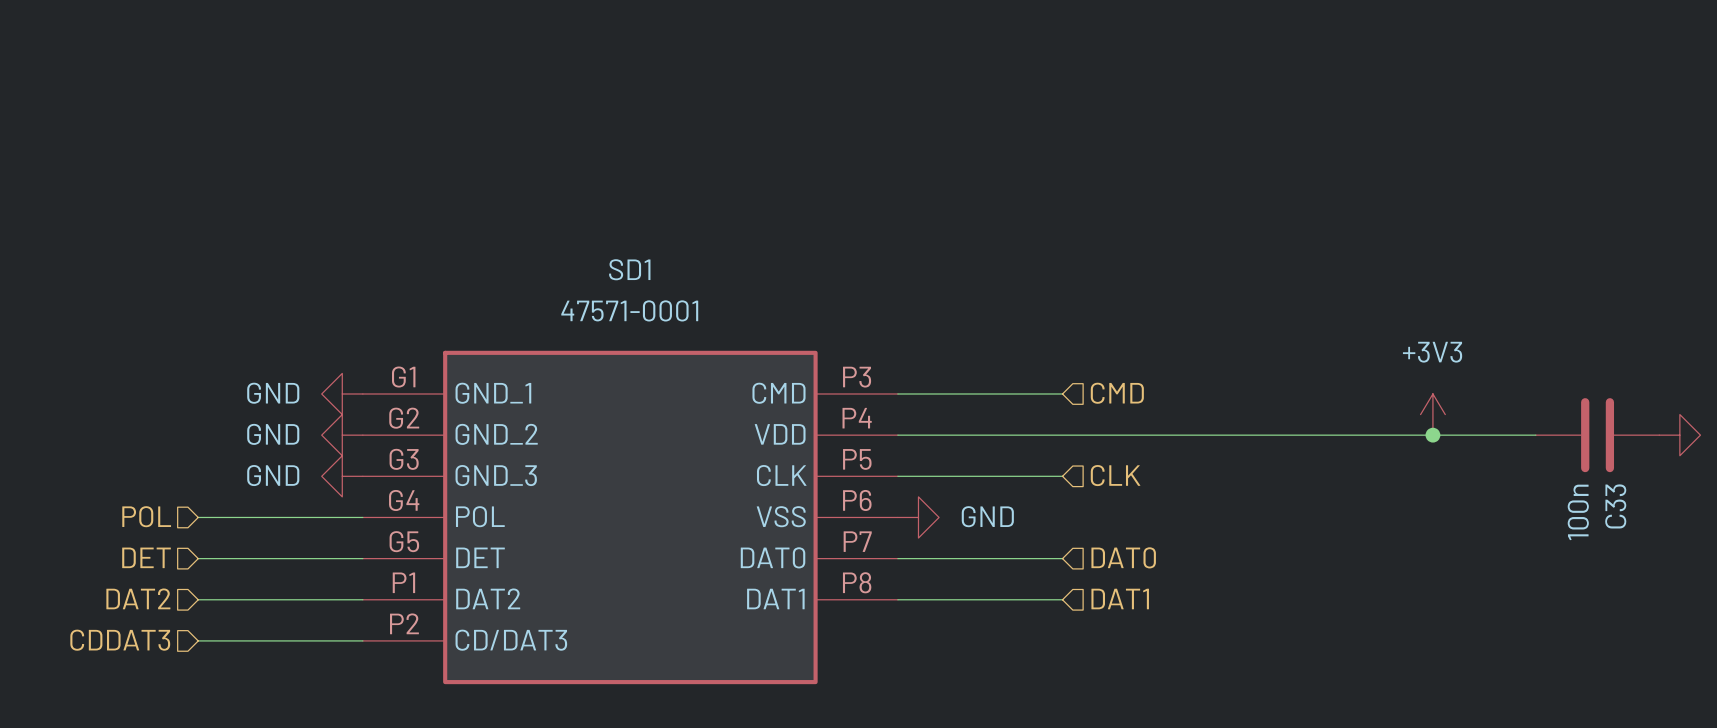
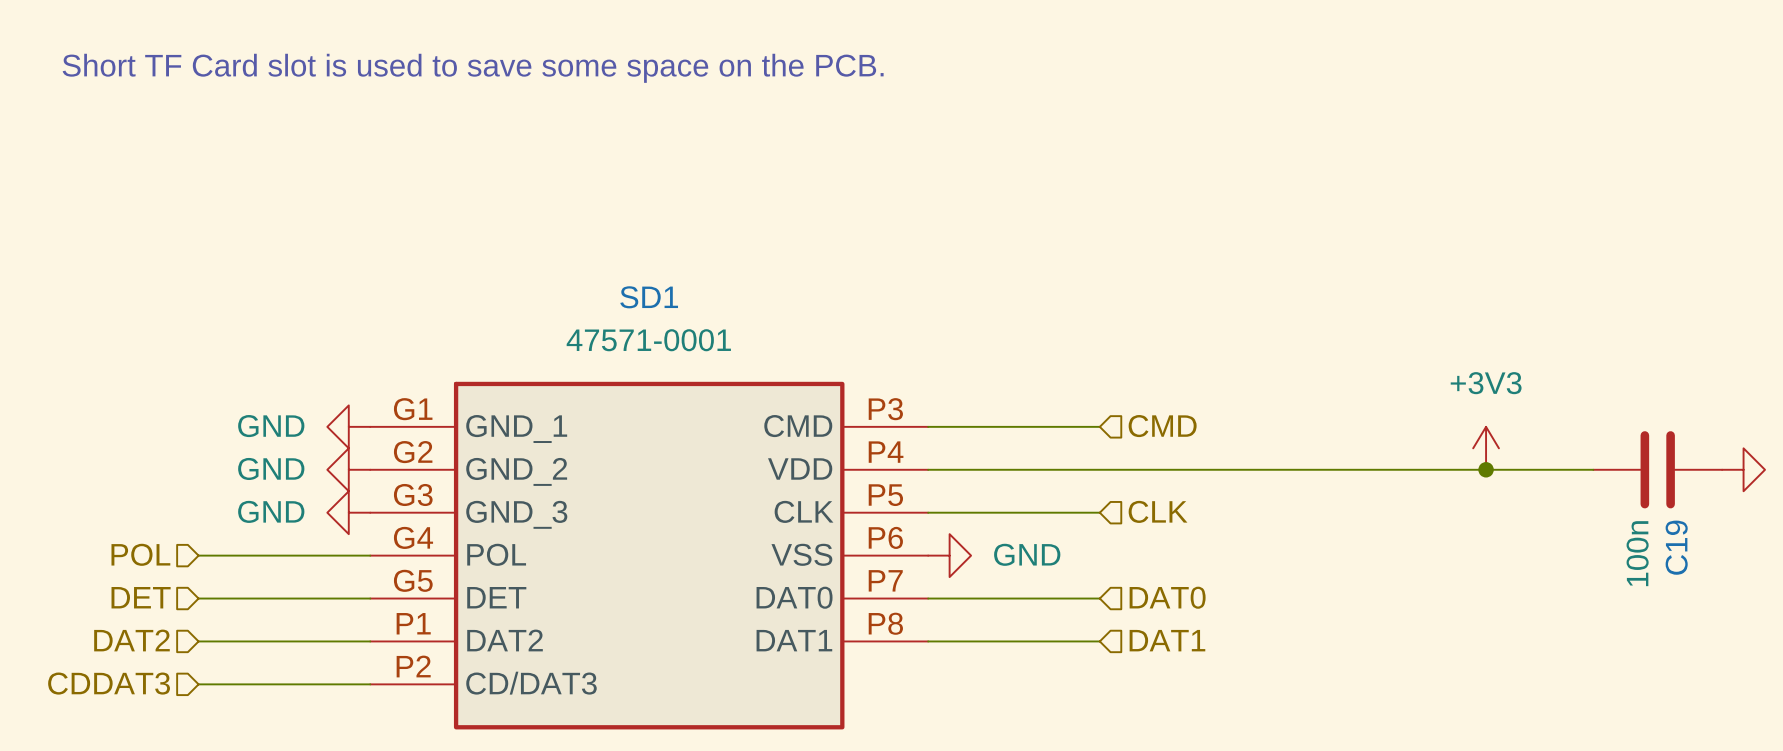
text: none -> Short TF Card slot is used to save some space on the PCB. (473, 68)
C33 name: C33 (1615, 506) -> C19 (1676, 547)

